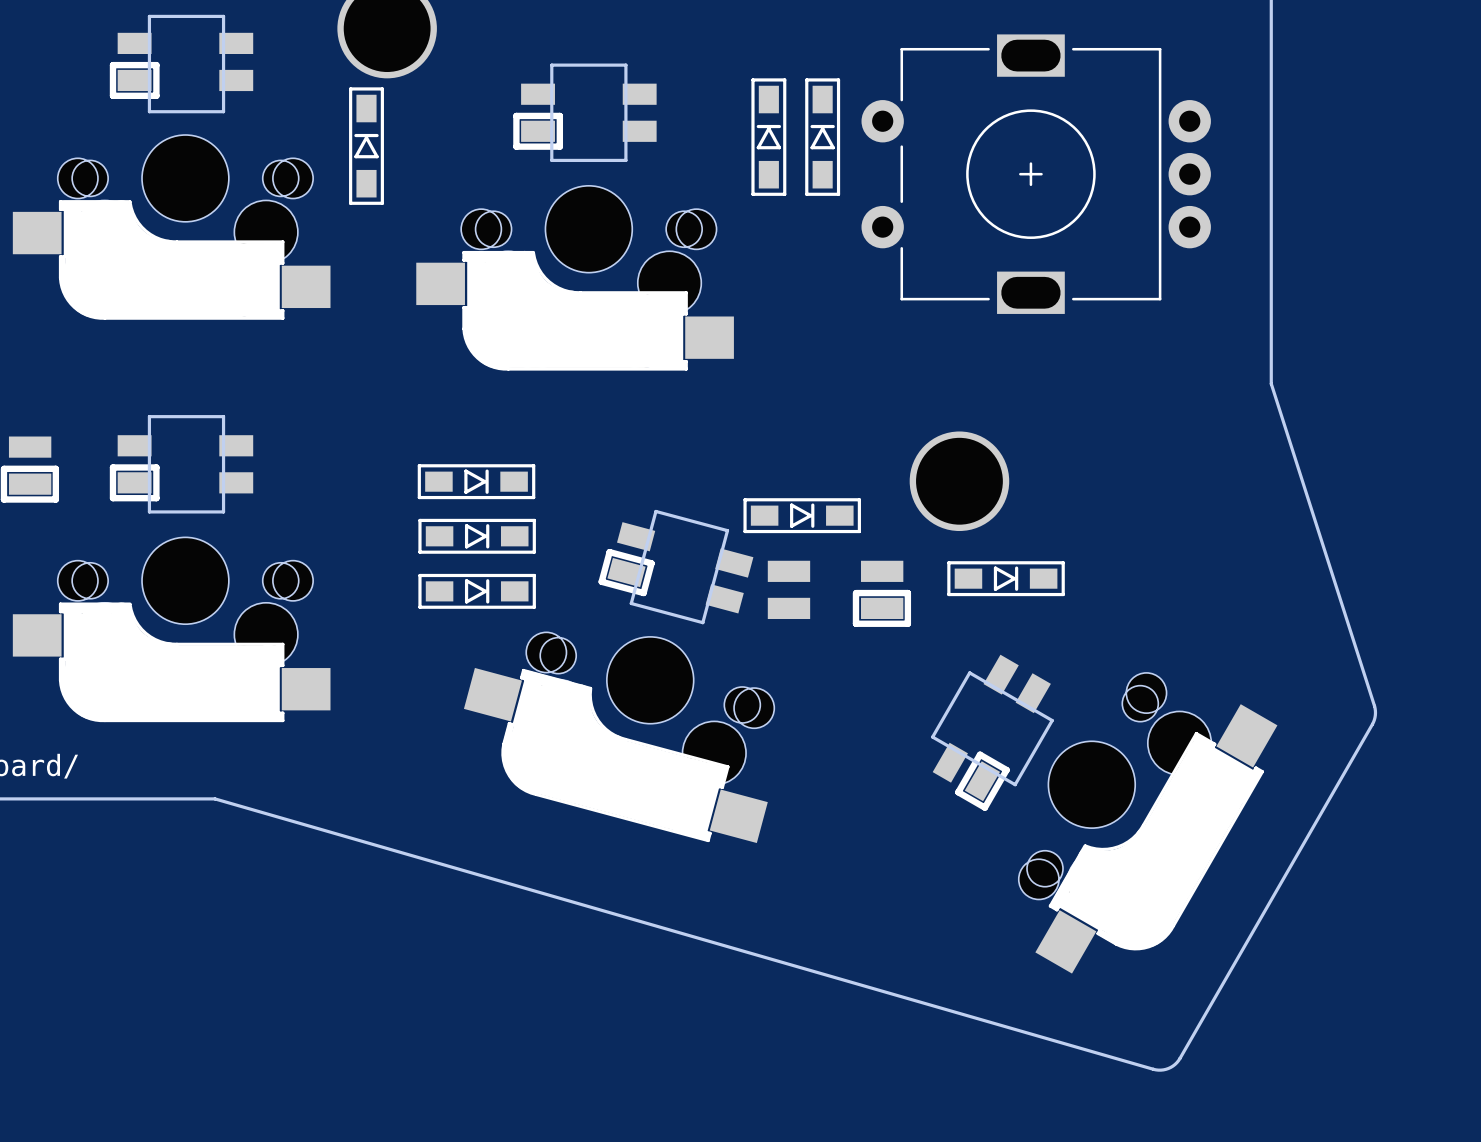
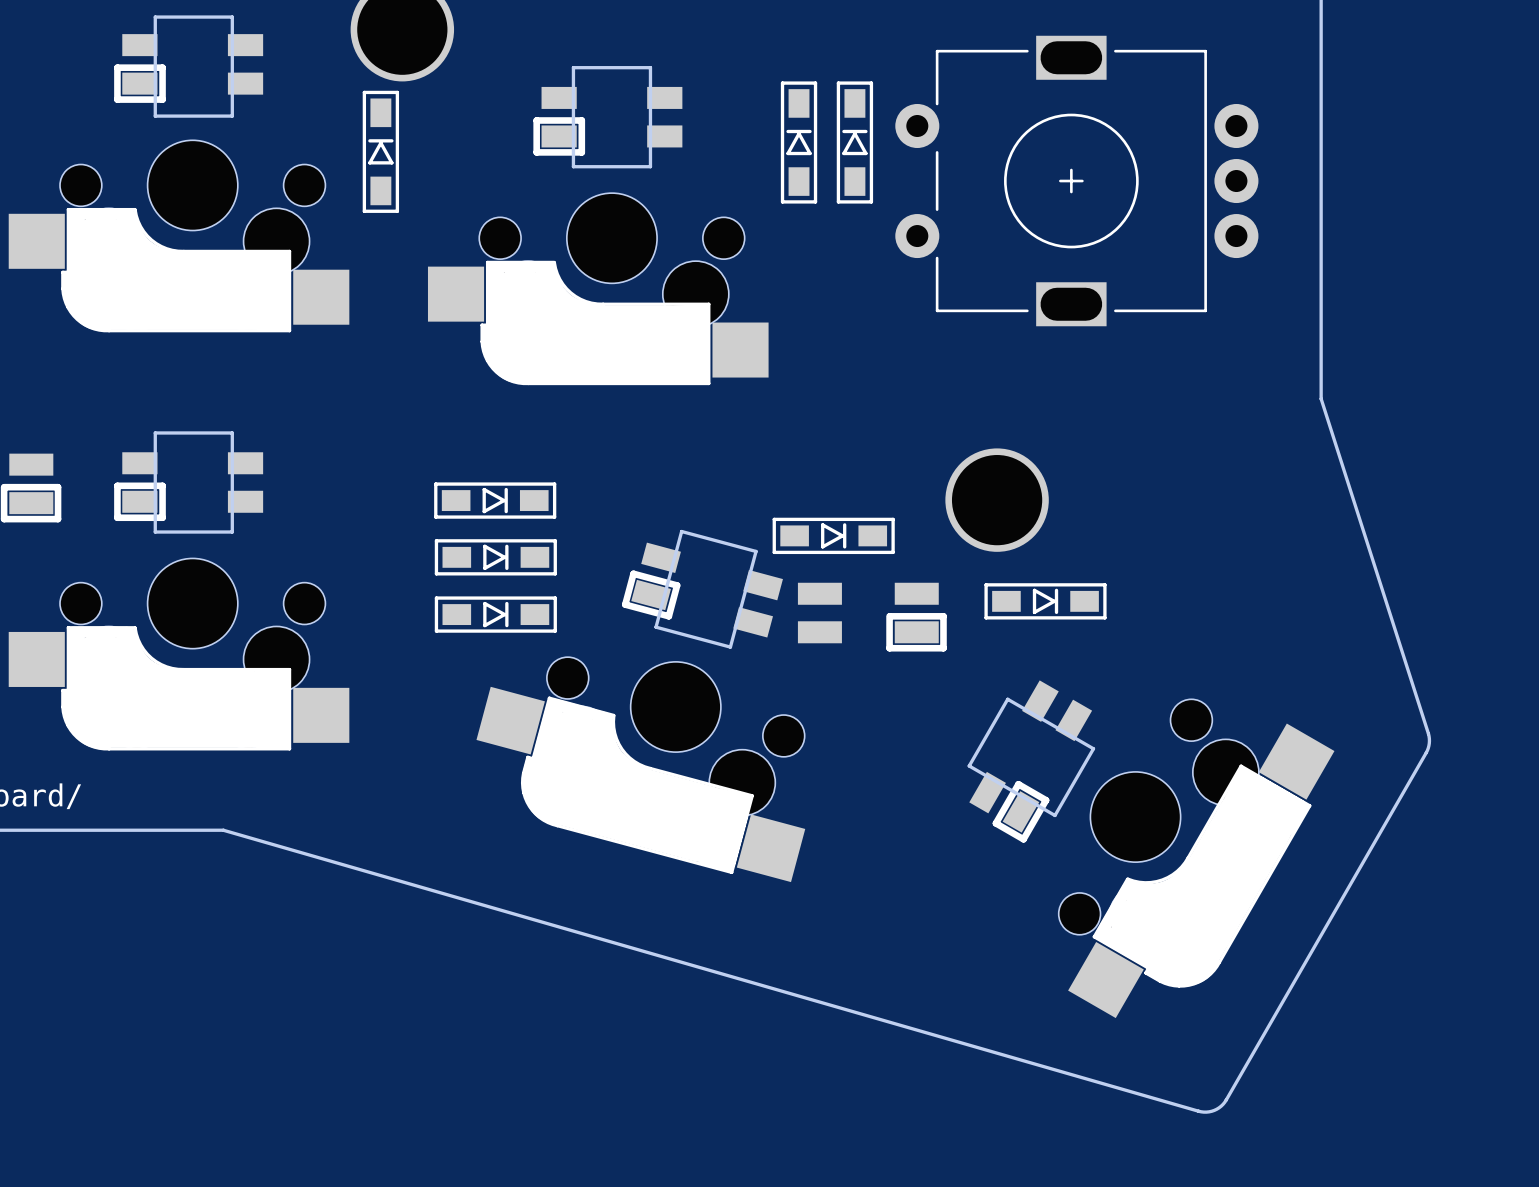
part footprint: [12, 32, 331, 320] -> [8, 34, 350, 333]
part footprint: [416, 83, 734, 371] -> [427, 86, 769, 386]
part footprint: [12, 435, 331, 723] -> [8, 452, 350, 751]
part footprint: [463, 522, 775, 844] -> [476, 542, 806, 883]
part footprint: [932, 654, 1278, 974] -> [969, 680, 1335, 1019]

